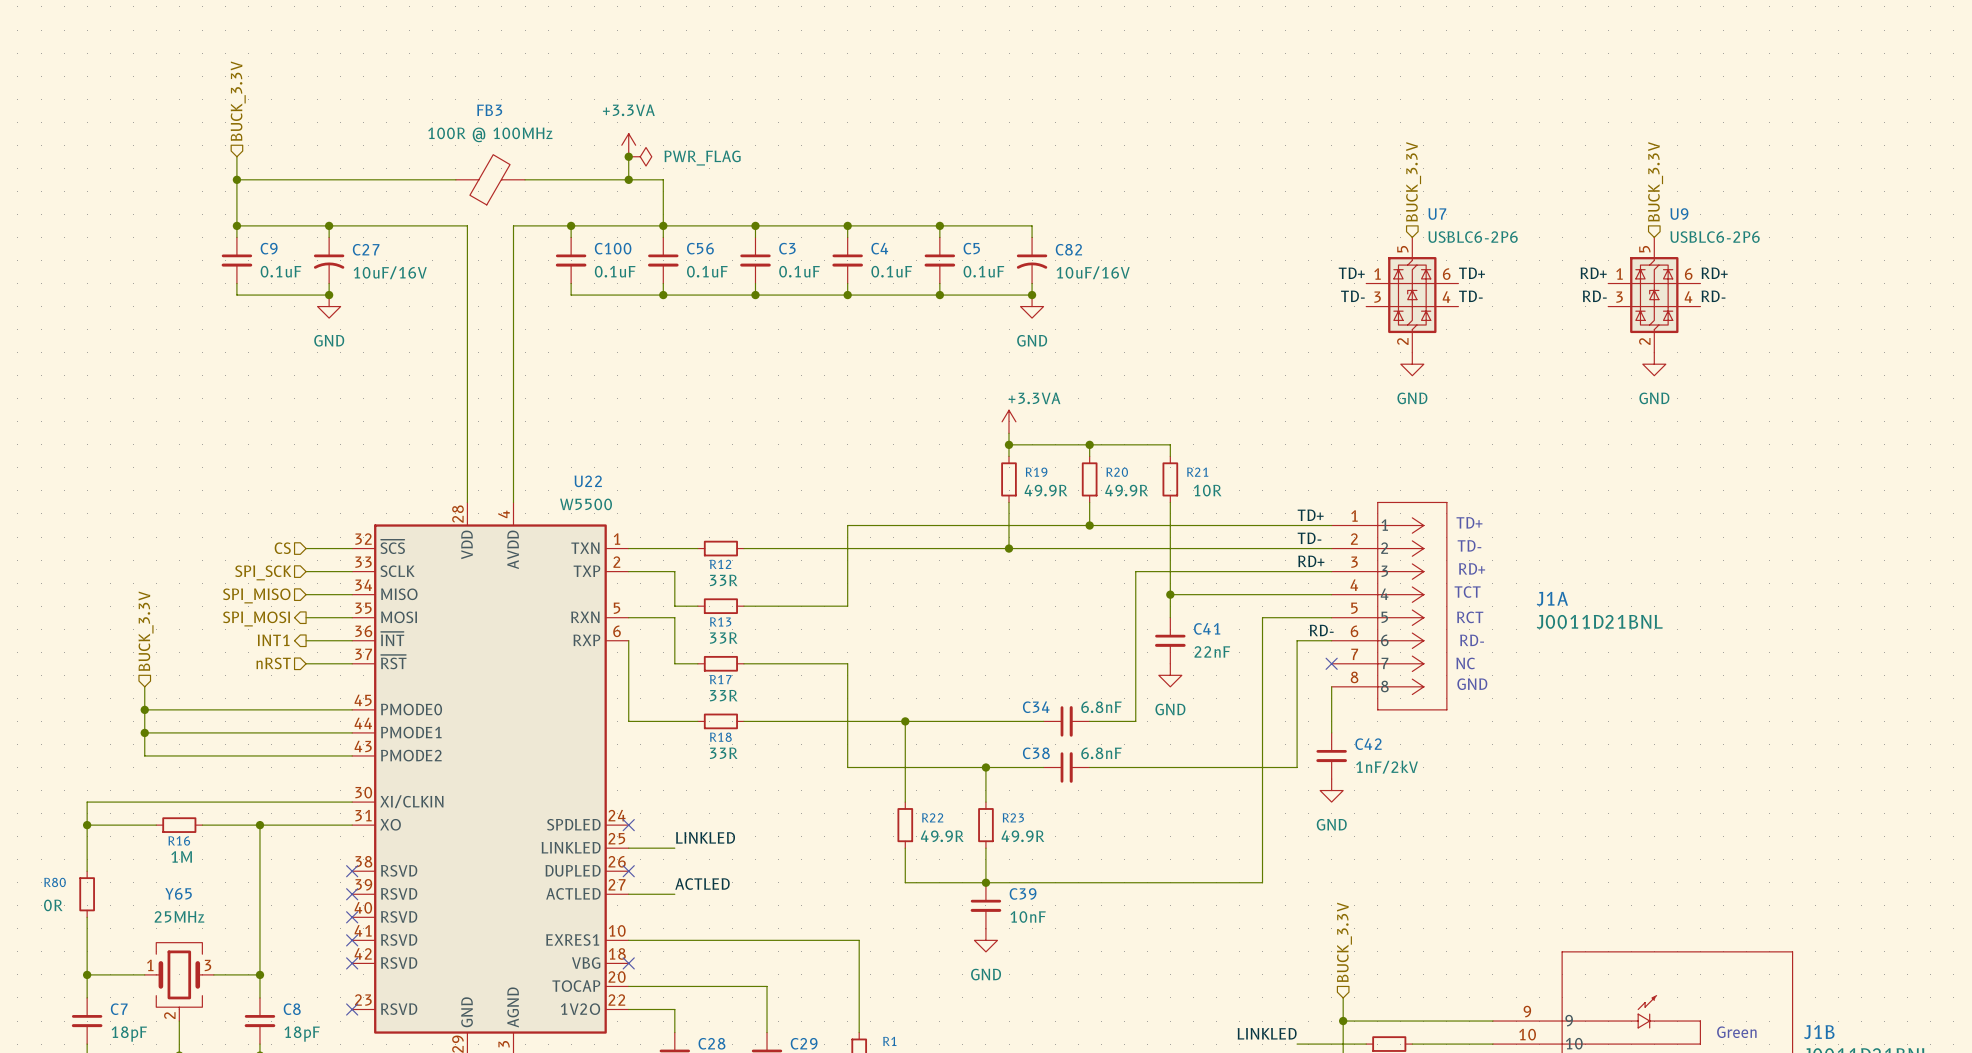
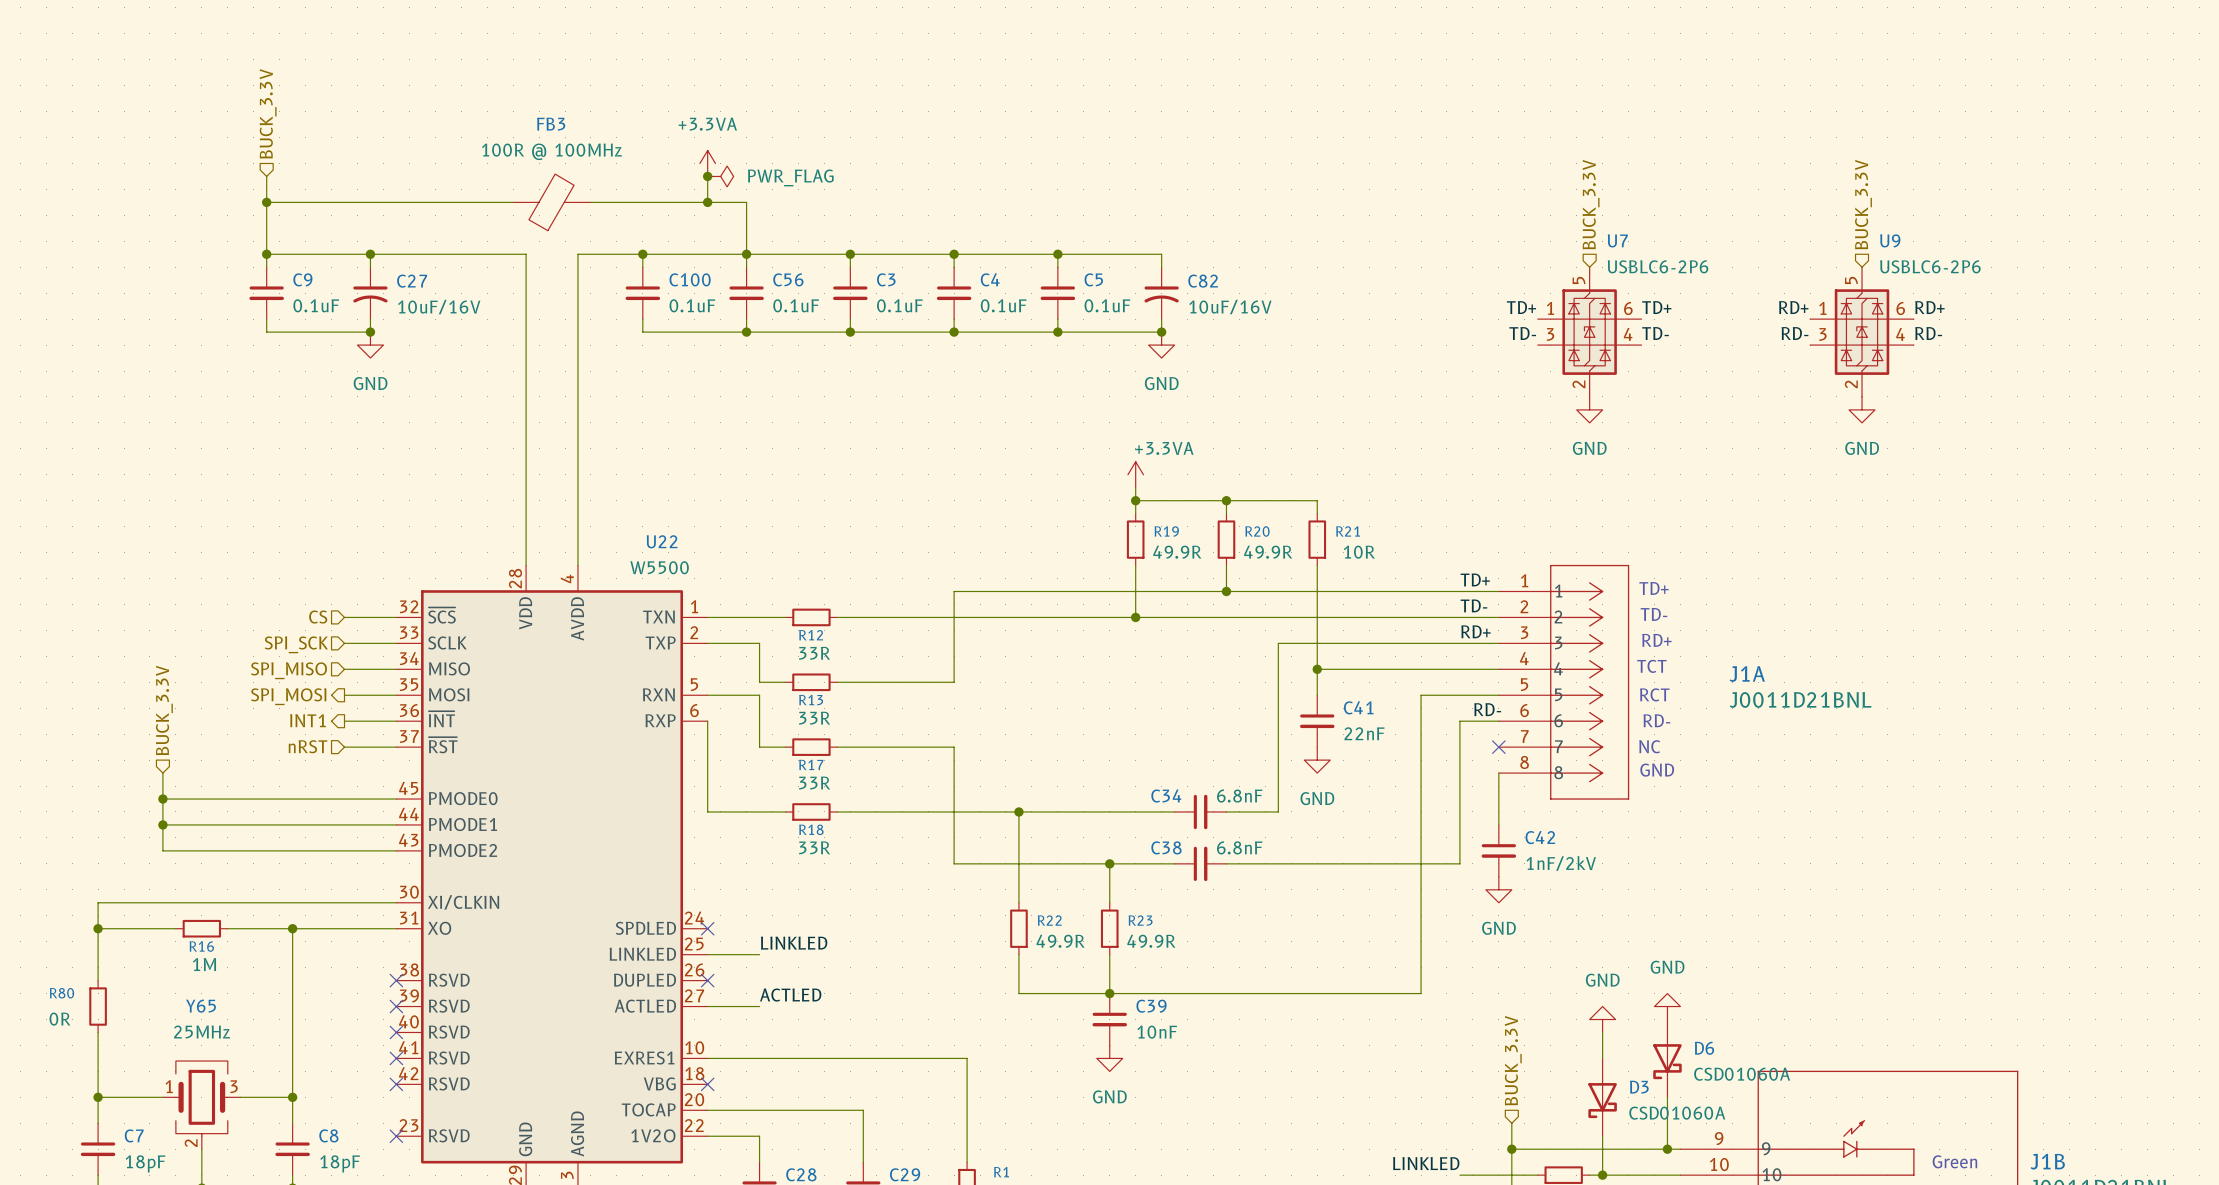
power symbol: none -> GND (1667, 1006)
power symbol: none -> GND (1602, 1019)
wire: none -> (1602, 1032) (1602, 1058)
D6: none -> CSD01060A (1667, 1058)
D3: none -> CSD01060A (1602, 1097)
wire: none -> (1667, 1097) (1667, 1149)
wire: none -> (1602, 1136) (1602, 1175)
junction: none -> (1667, 1149)
junction: none -> (1602, 1175)

